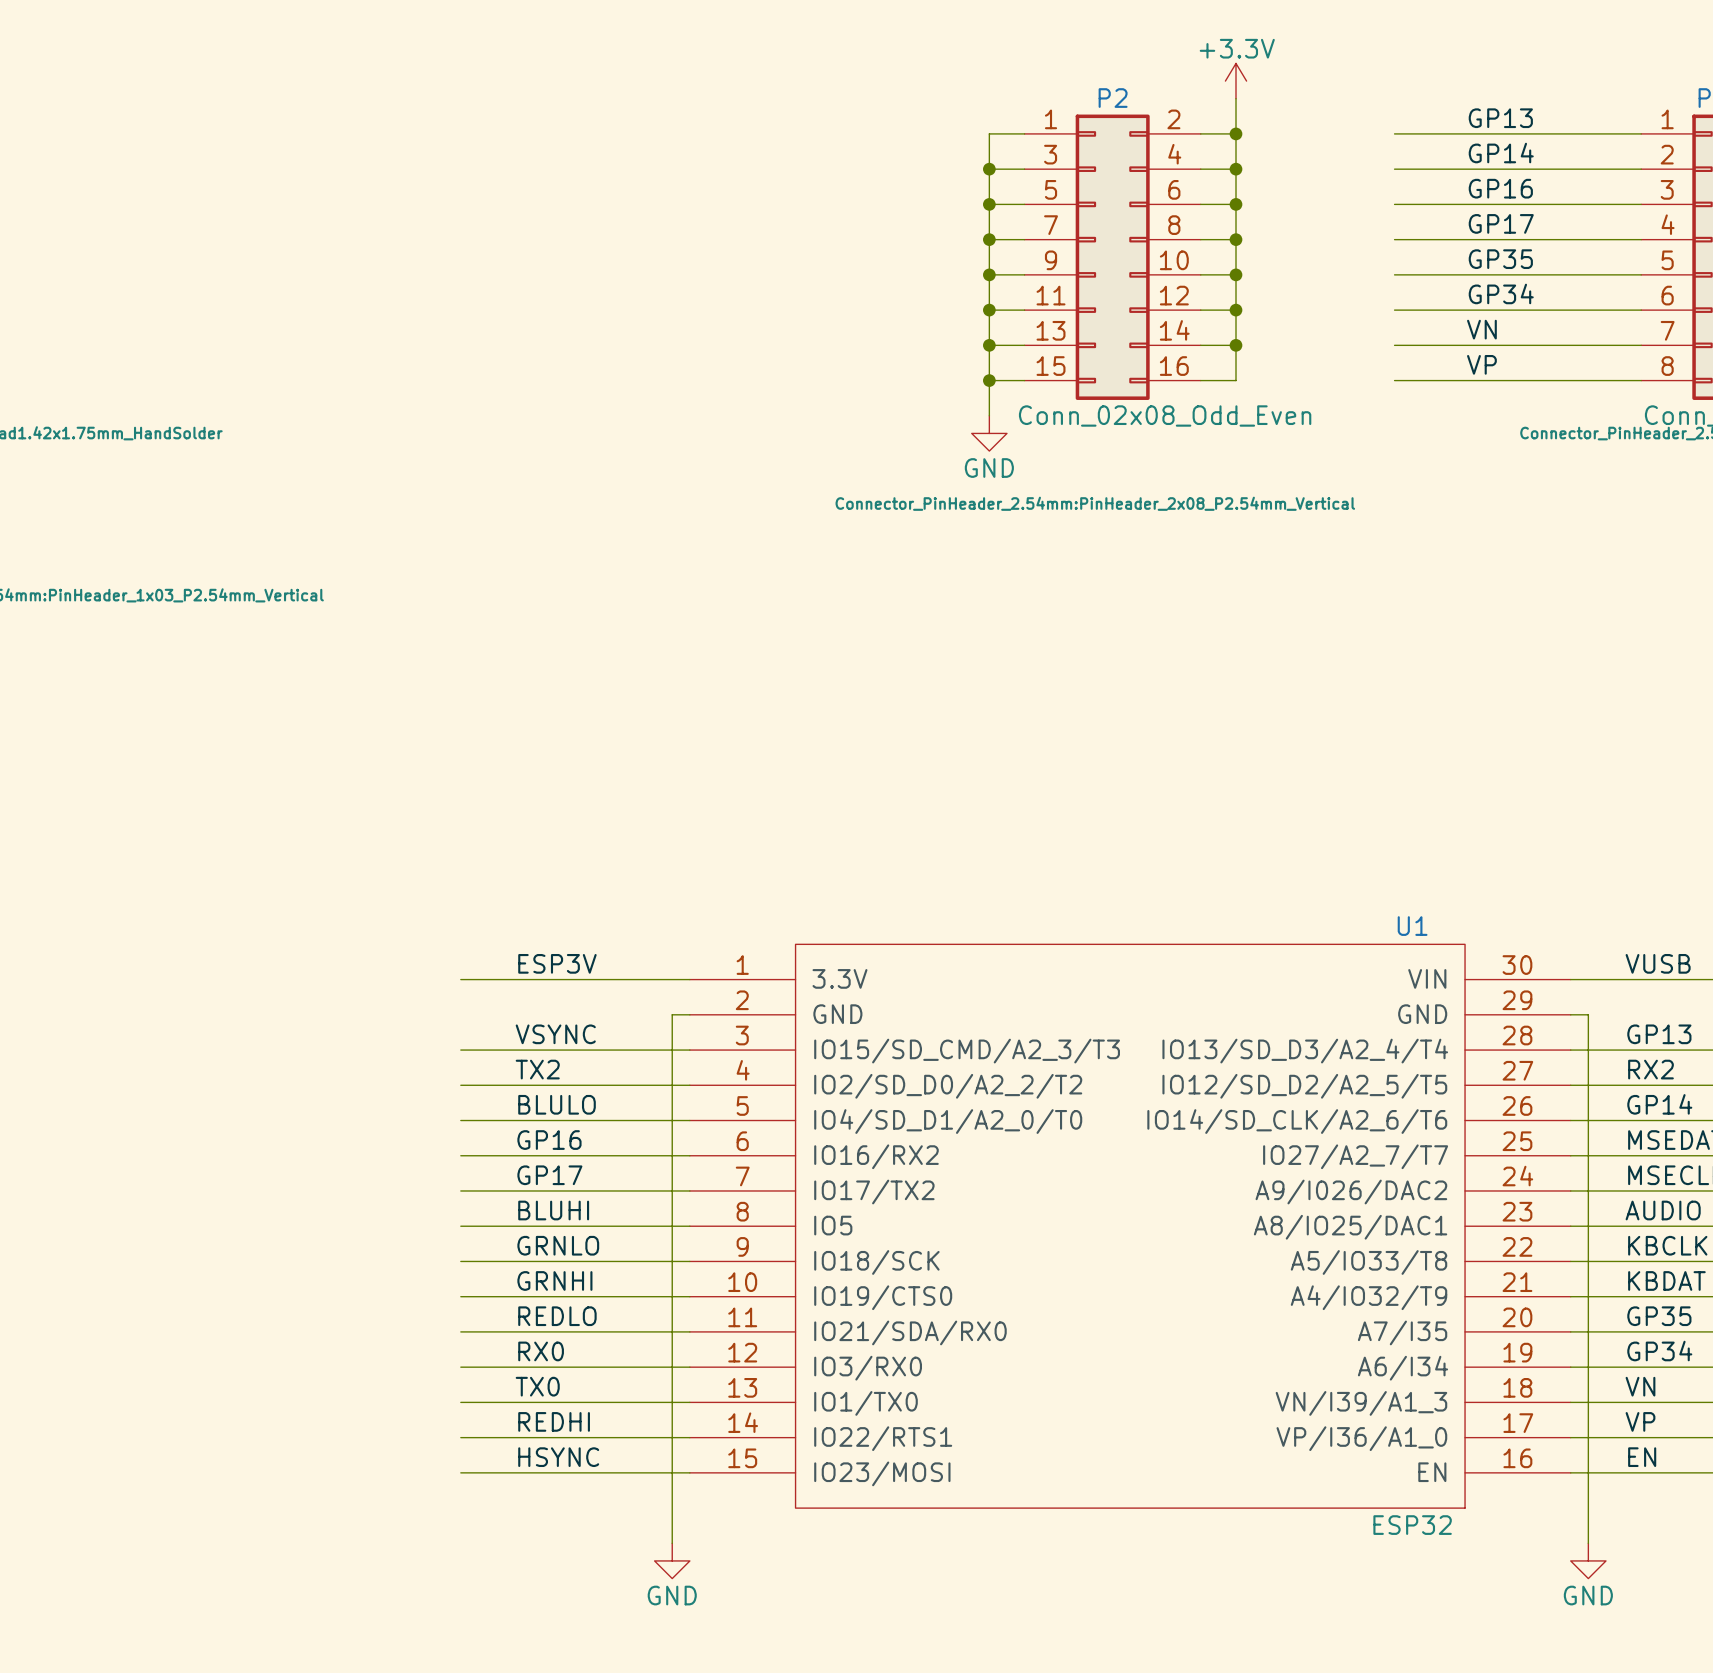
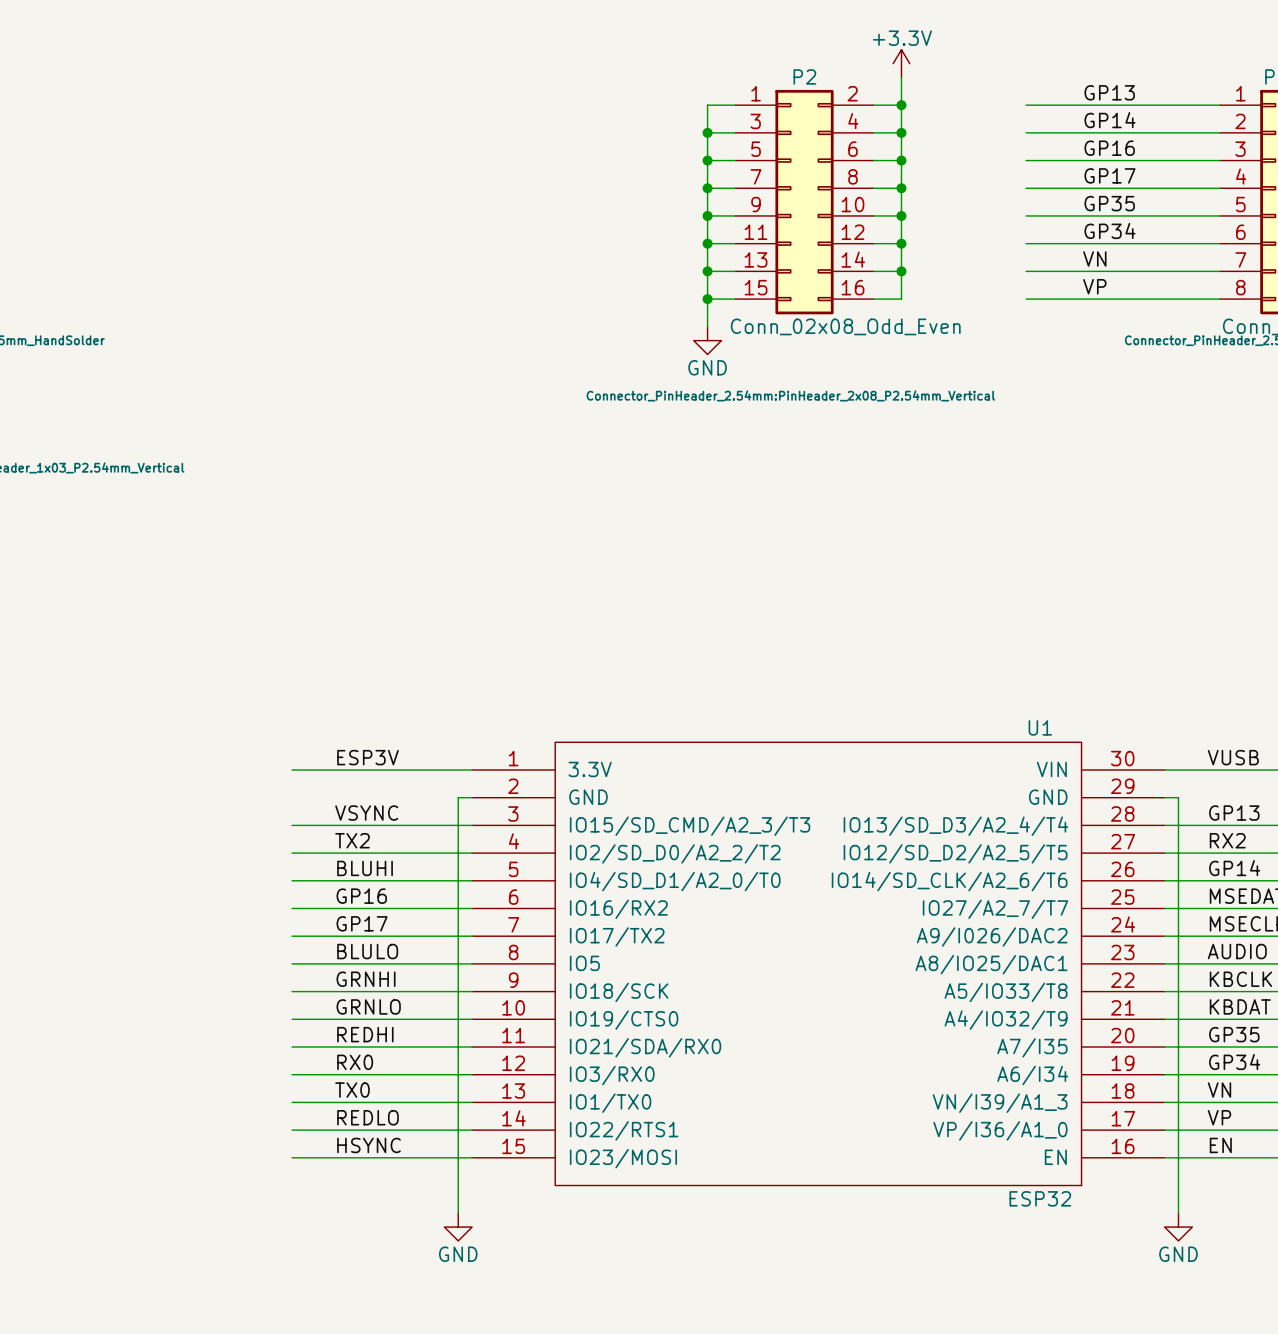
label: BLULO (557, 1104) -> BLUHI (365, 868)
label: BLUHI (553, 1210) -> BLULO (367, 951)
label: GRNLO (558, 1245) -> GRNHI (366, 979)
label: GRNHI (554, 1280) -> GRNLO (368, 1006)
label: REDLO (557, 1316) -> REDHI (365, 1034)
label: REDHI (554, 1421) -> REDLO (368, 1117)

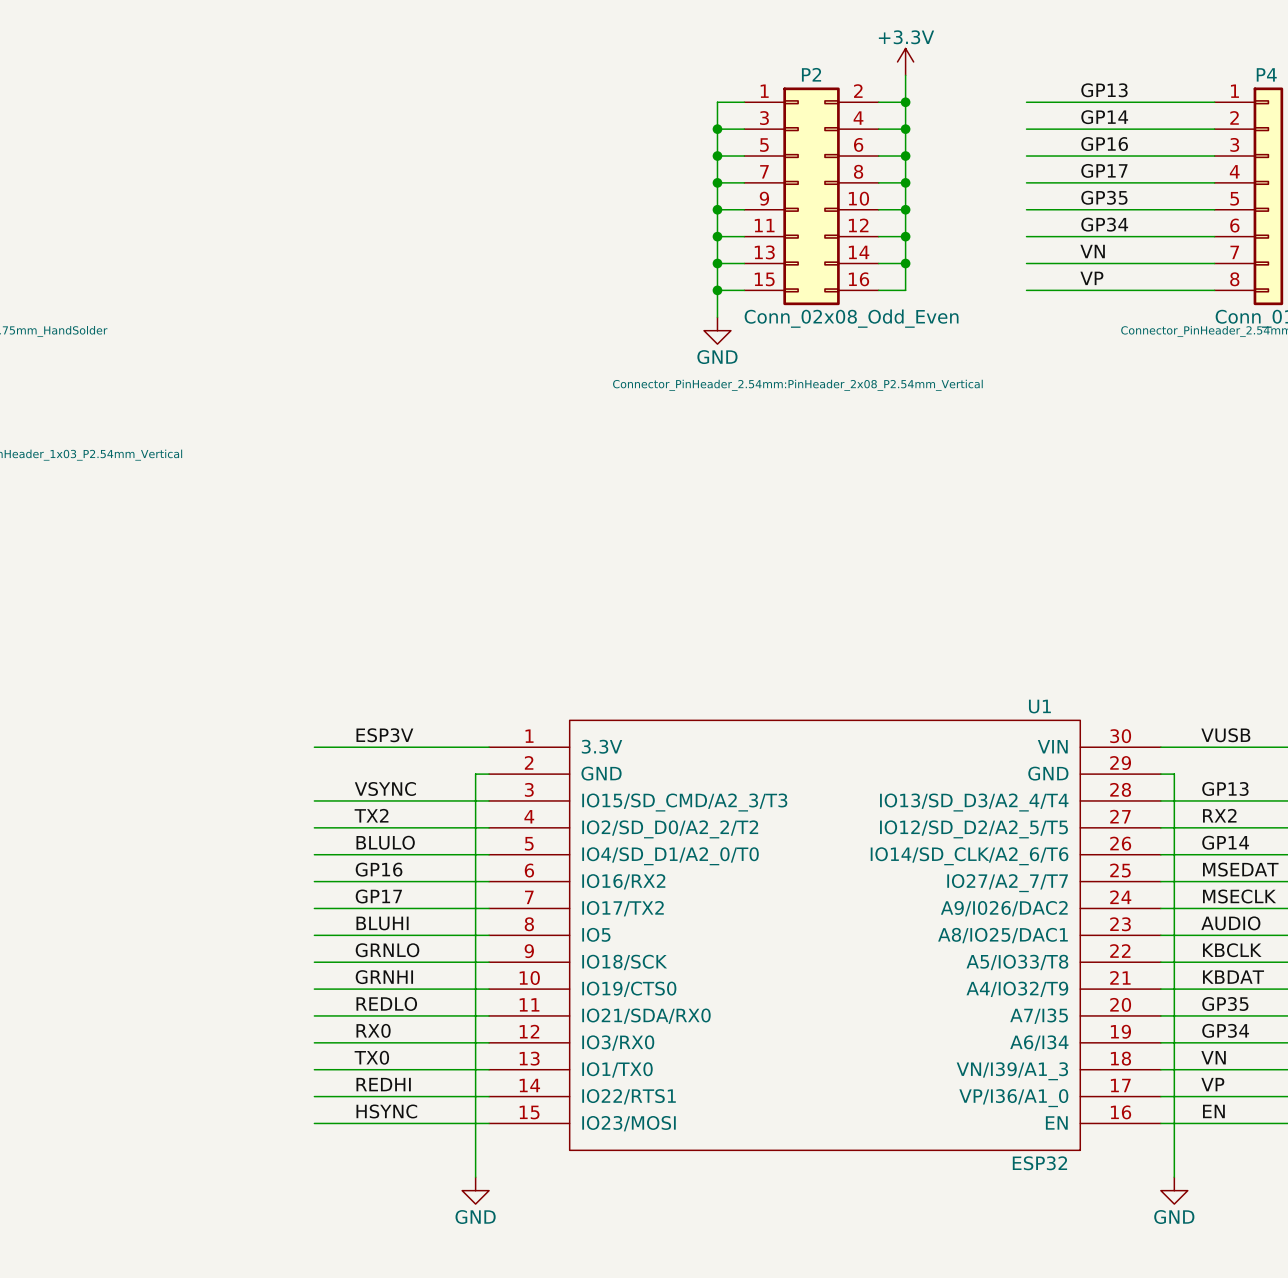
label: BLUHI (365, 868) -> BLULO (385, 842)
label: BLULO (367, 951) -> BLUHI (382, 923)
label: GRNHI (366, 979) -> GRNLO (387, 950)
label: GRNLO (368, 1006) -> GRNHI (384, 977)
label: REDHI (365, 1034) -> REDLO (386, 1003)
label: REDLO (368, 1117) -> REDHI (383, 1084)

